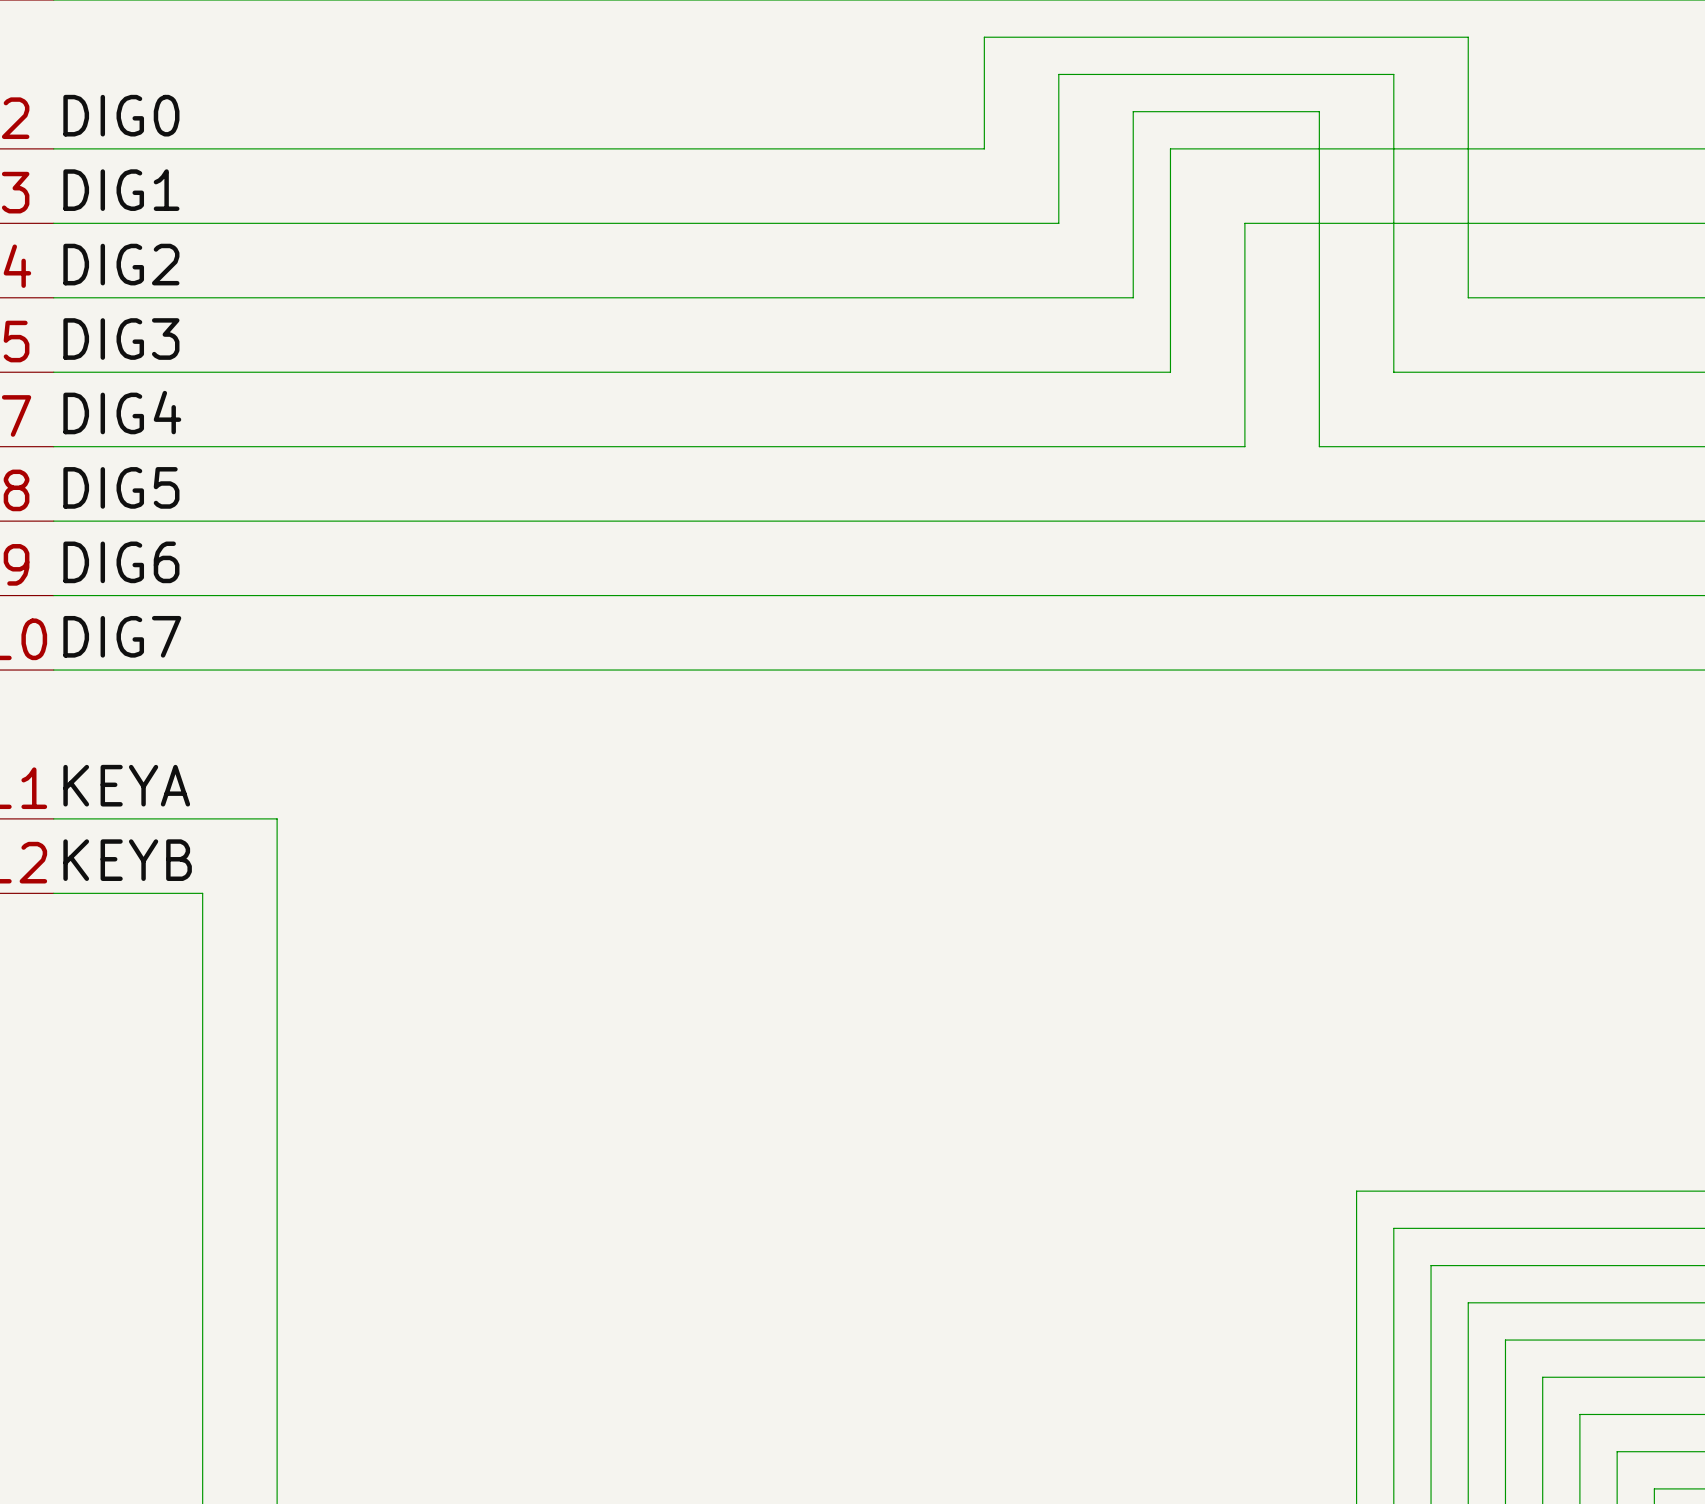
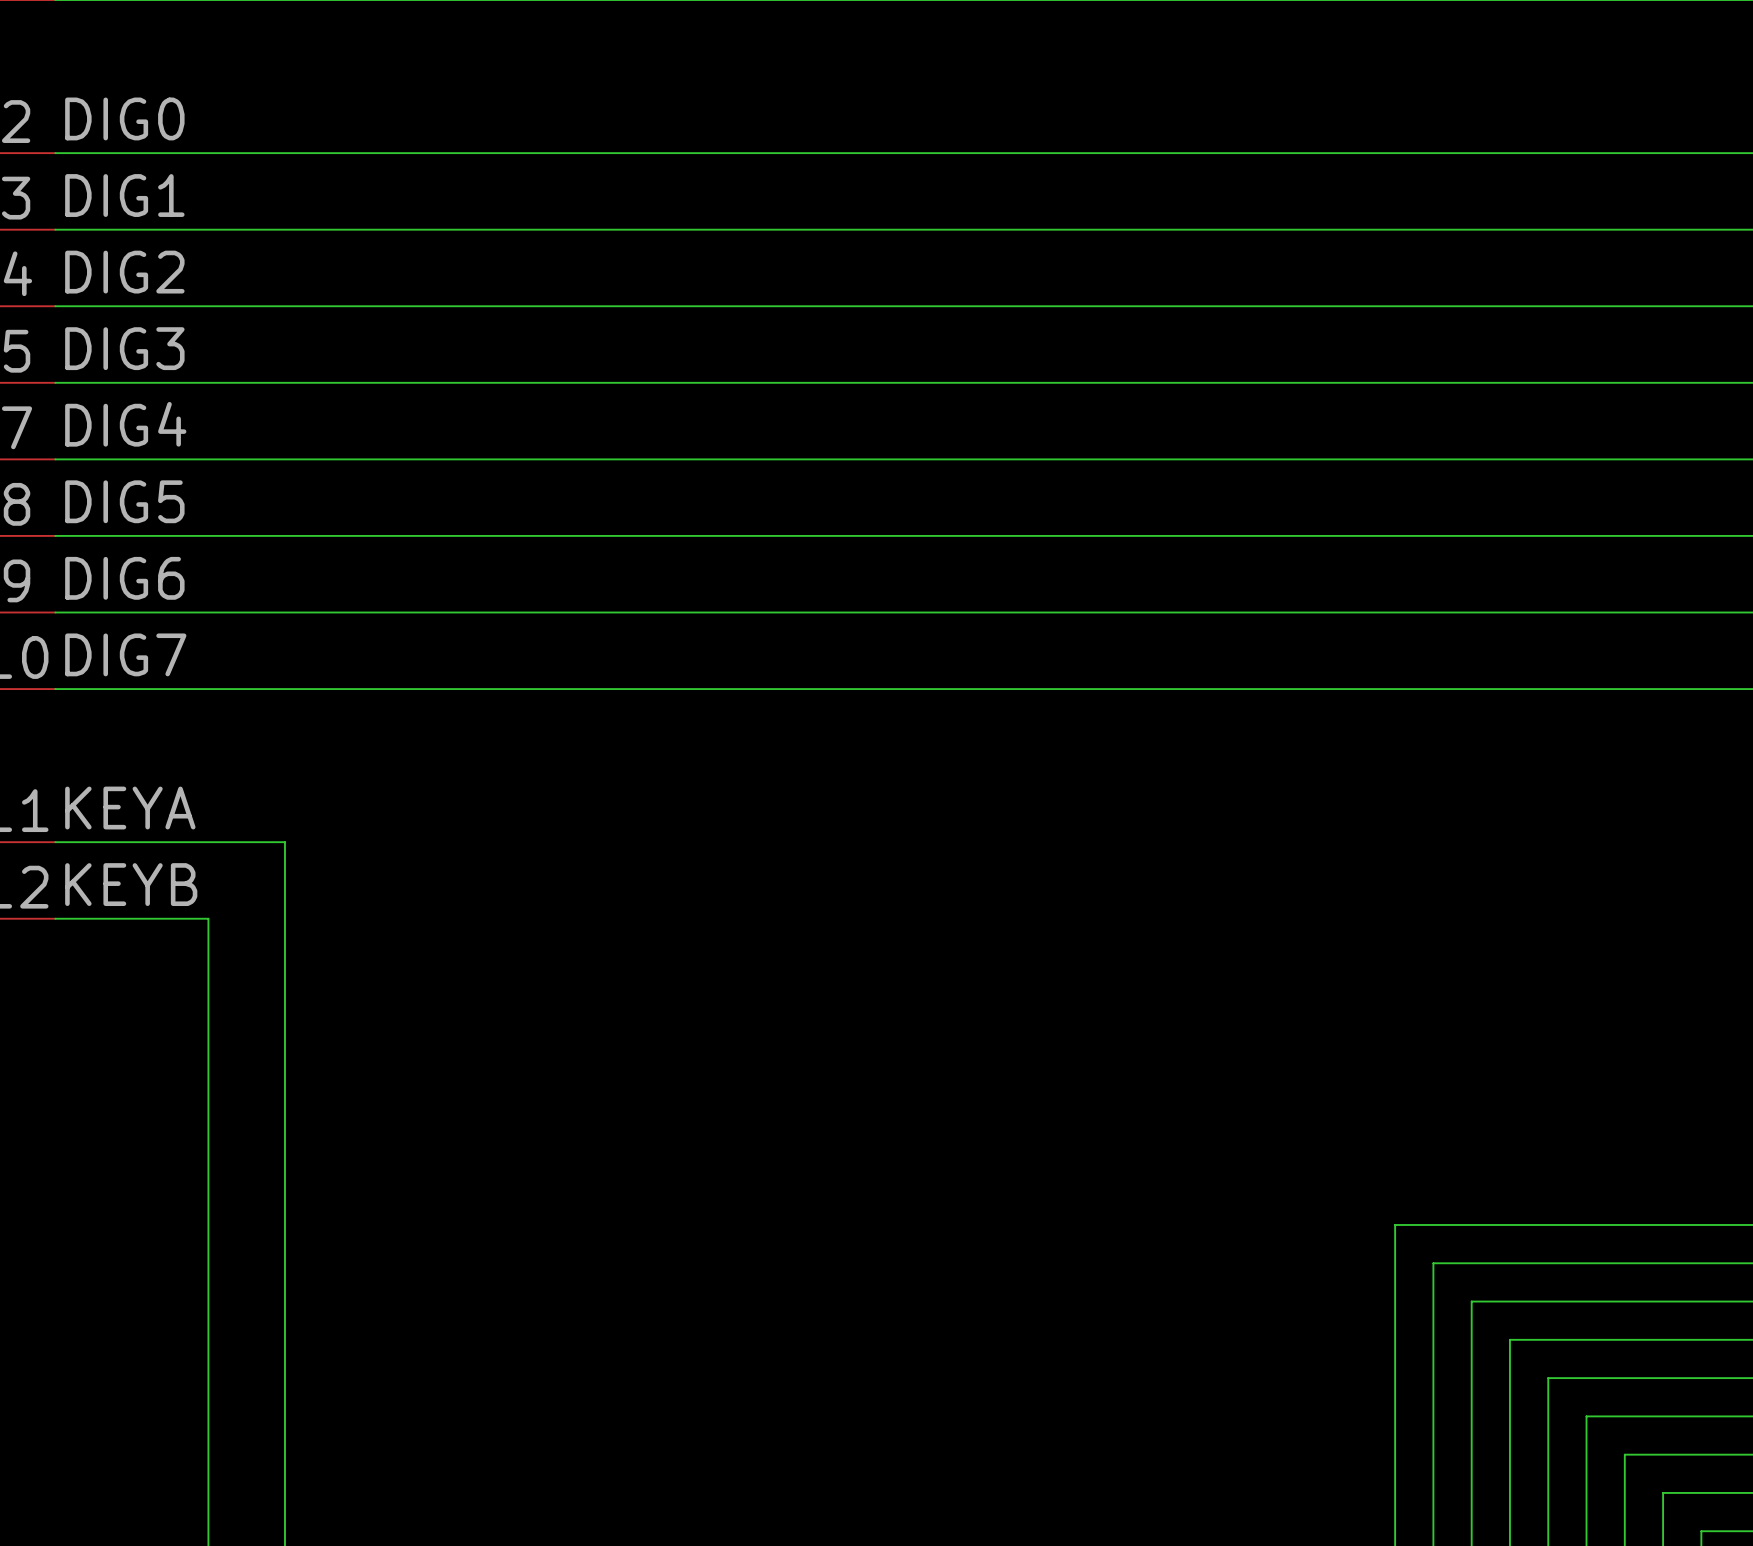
wire: (984, 148) (984, 37) (1468, 37) (1468, 297) -> (1165, 306) (1509, 306)
wire: (1170, 148) (1170, 372) -> (1203, 153) (1012, 153)
wire: (1058, 223) (1058, 74) (1393, 74) (1393, 372) -> (1203, 382) (1433, 382)
wire: (1244, 223) (1244, 446) -> (1280, 229) (1088, 229)
wire: (1133, 297) (1133, 111) (1319, 111) (1319, 446) -> (1280, 459) (1356, 459)

